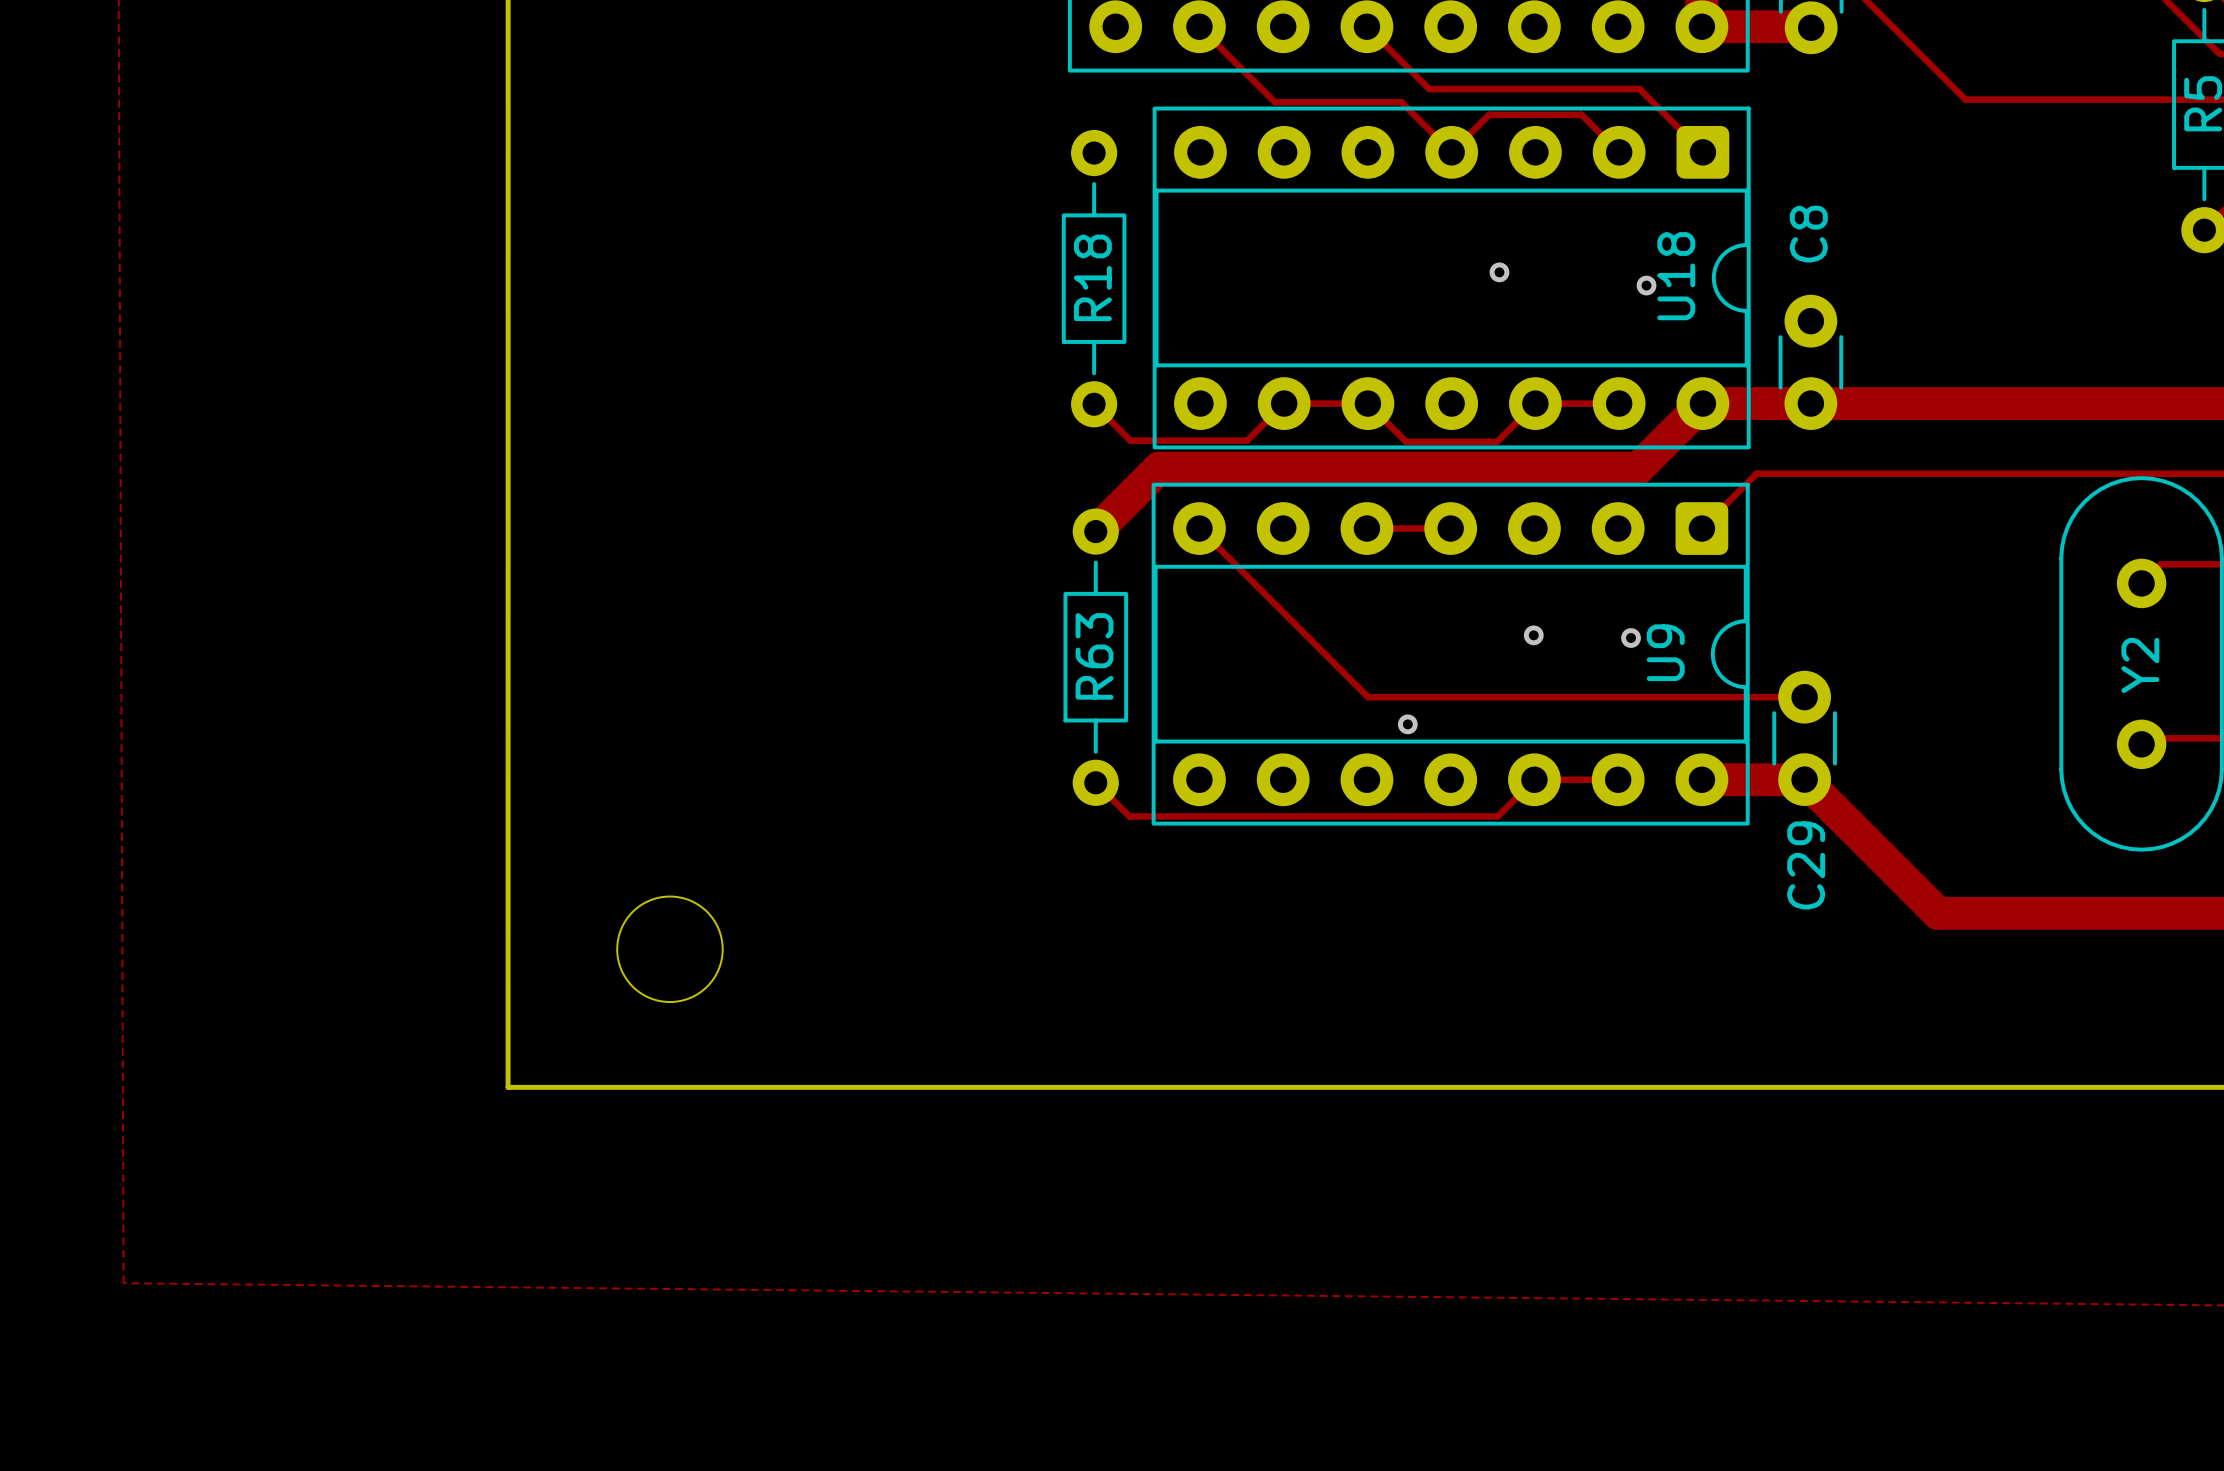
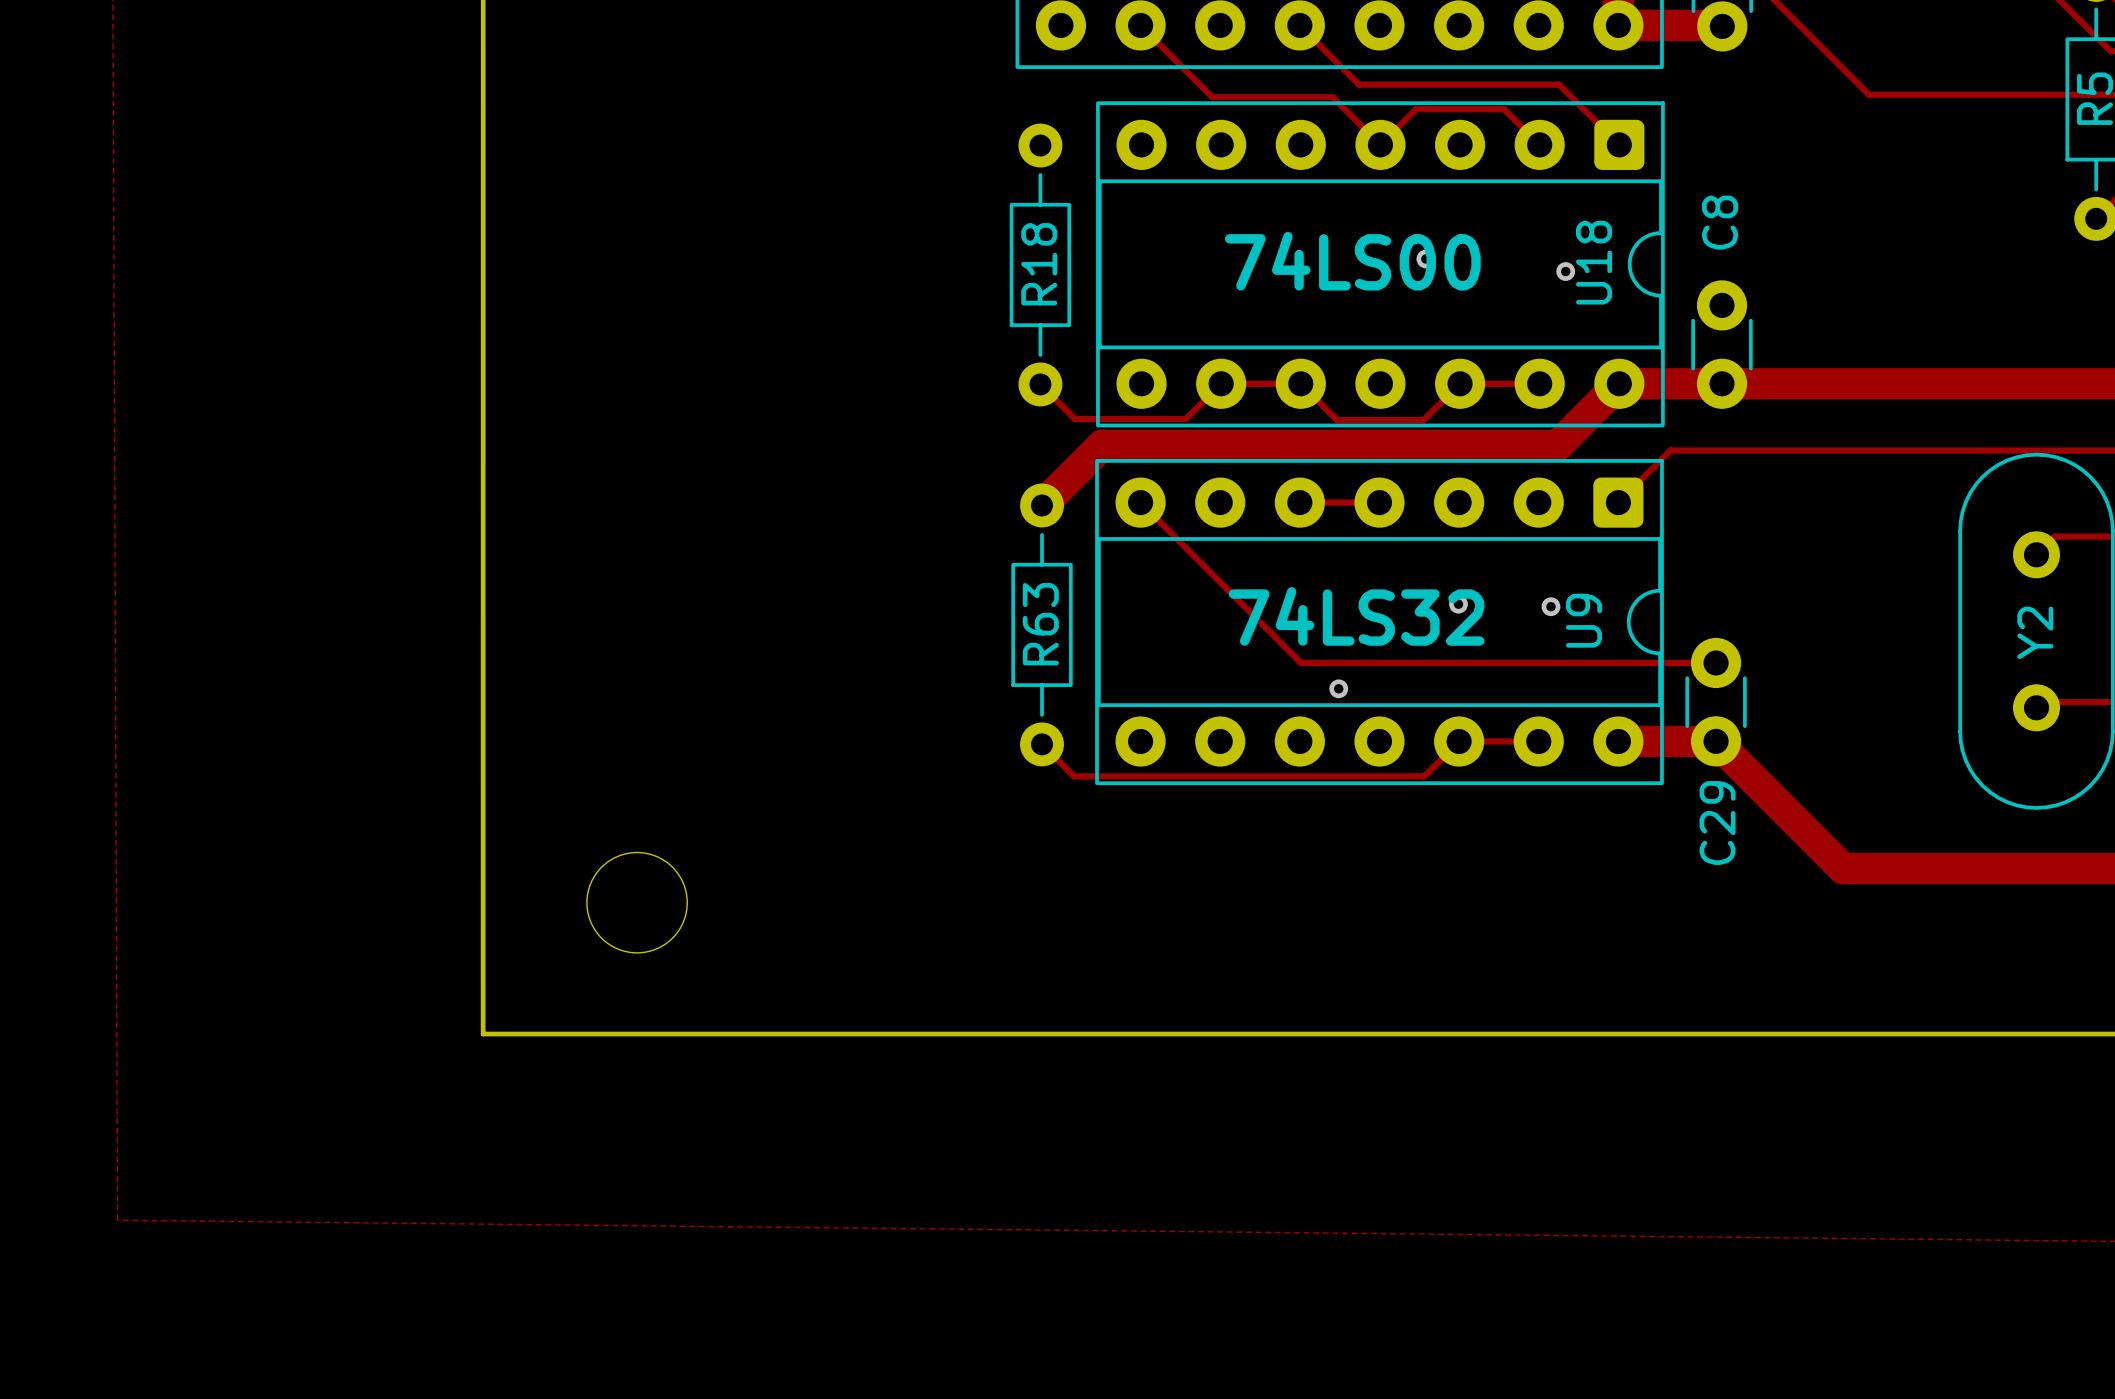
text: none -> 74LS00 (1352, 261)
text: none -> 74LS32 (1356, 616)

